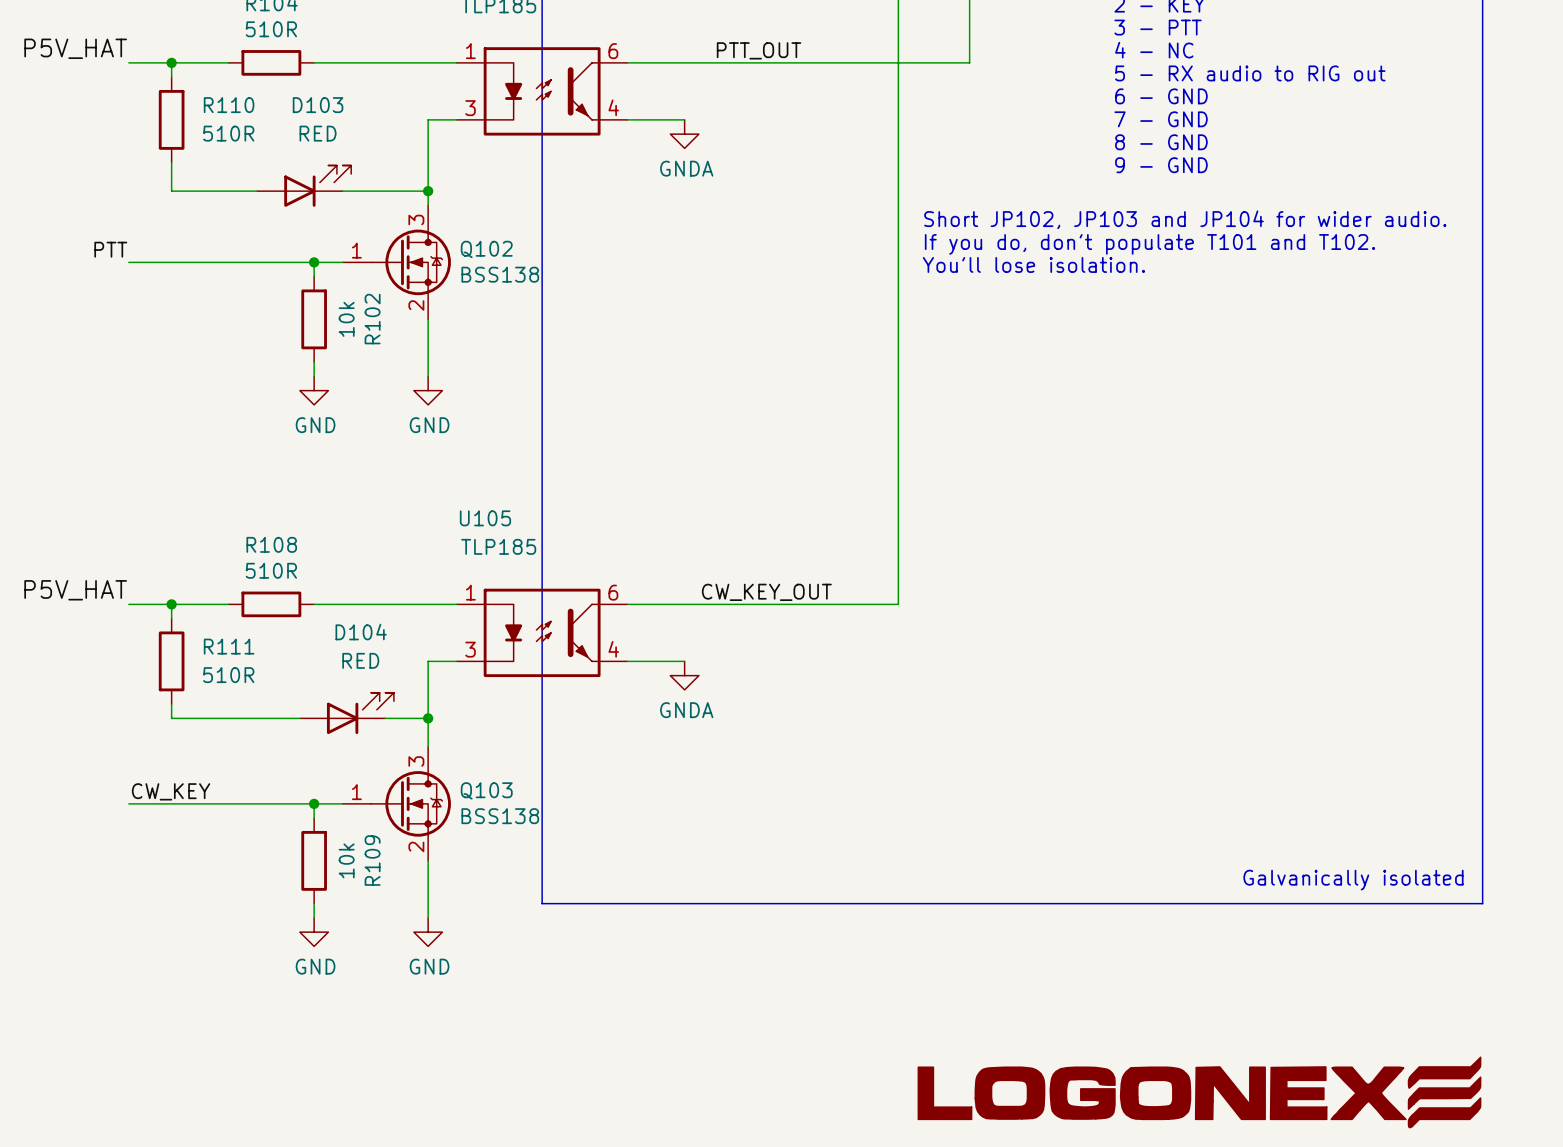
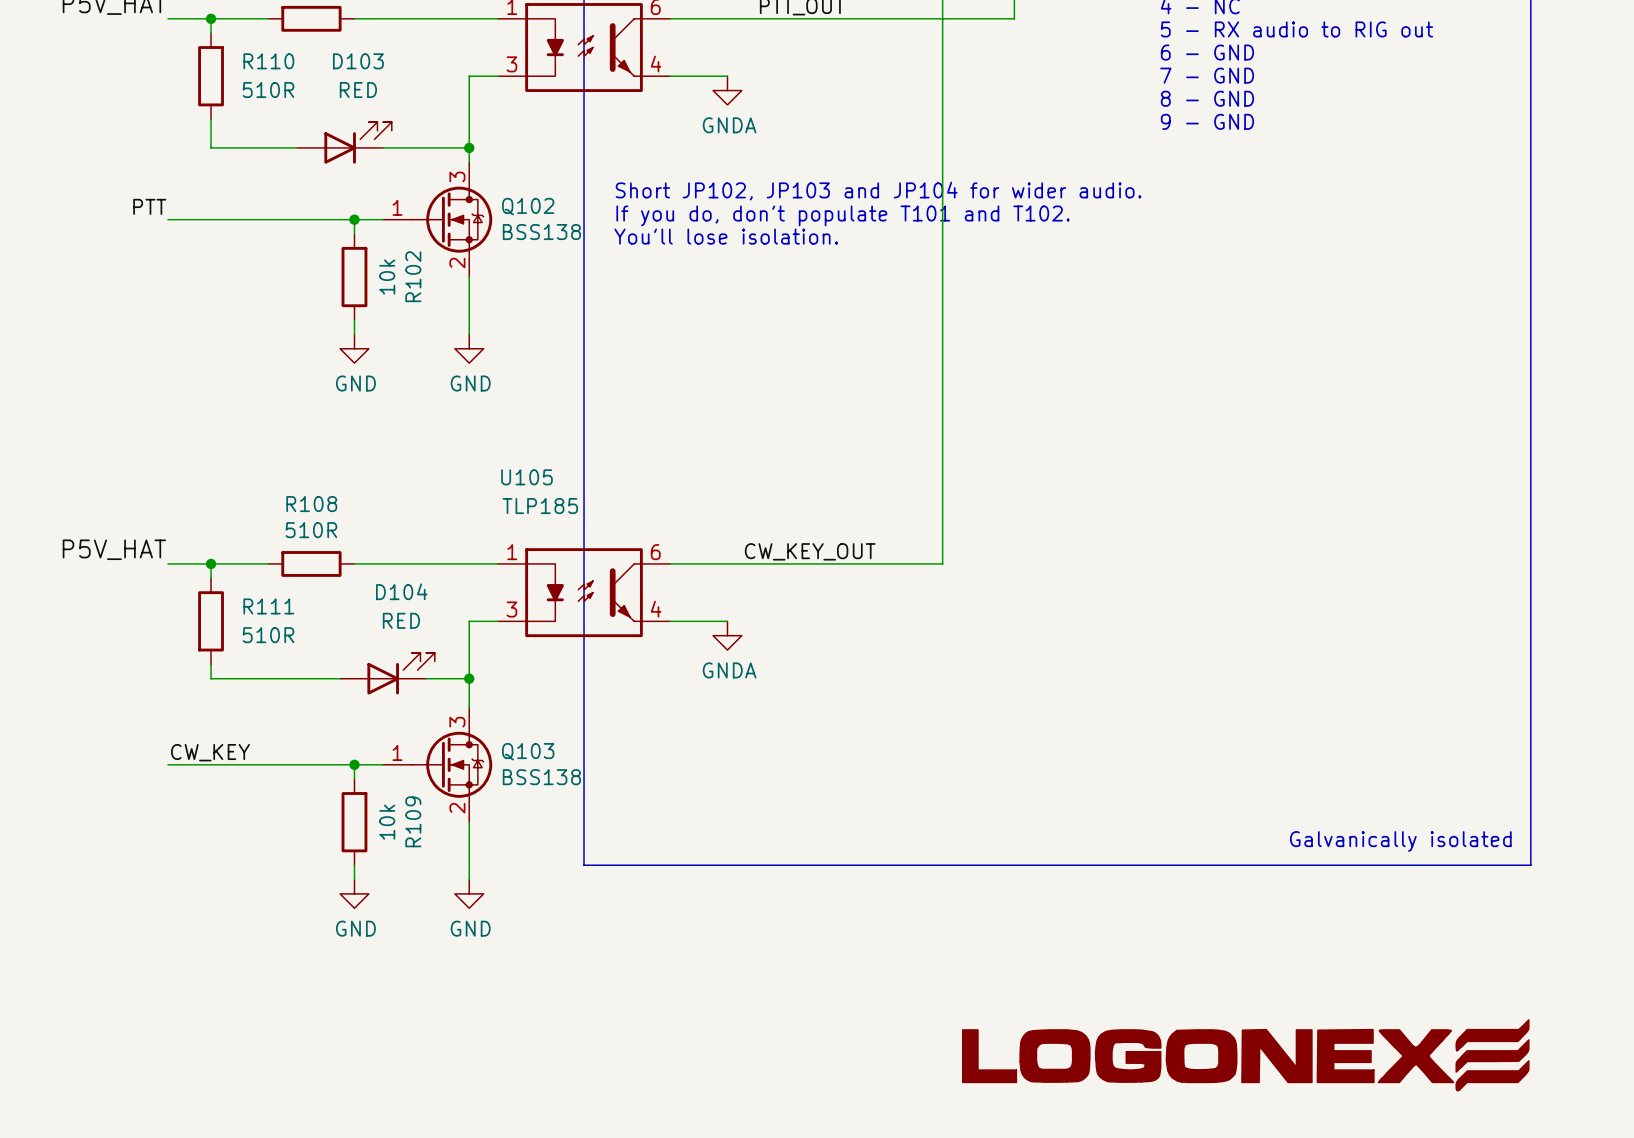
text: Short JP102, JP103 and JP104 for wider audio. (1185, 219) -> none
text: none -> Short JP102, JP103 and JP104 for wider audio. (878, 191)
text: If you do, don't populate T101 and T102. (1149, 244) -> none
text: none -> If you do, don't populate T101 and T102. (843, 215)
text: You'll lose isolation. (1033, 264) -> none
text: none -> You'll lose isolation. (726, 236)

